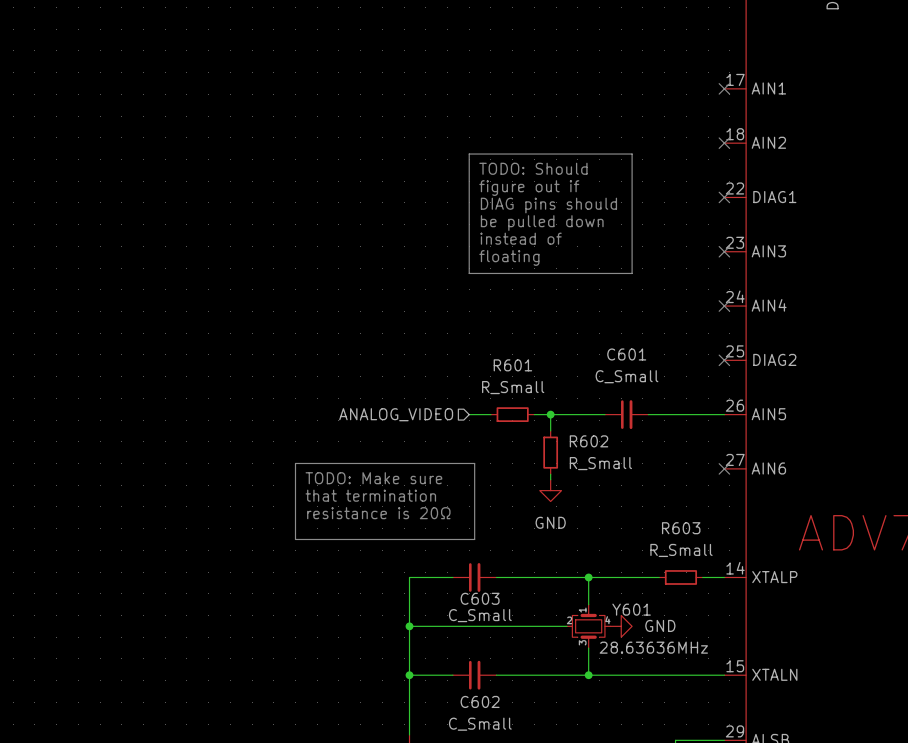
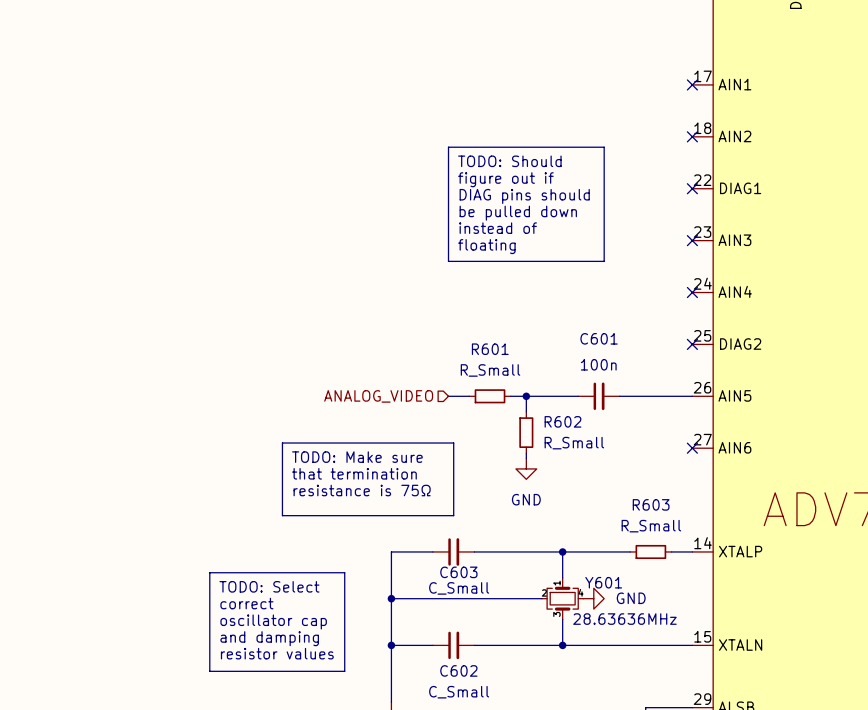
C601 value: C_Small (626, 376) -> 100n (598, 364)
text: resistance is 20Ω (378, 513) -> resistance is 75Ω (362, 490)
line: none -> (209, 572) (344, 572) (344, 671) (209, 671) (209, 572)
text: none -> TODO: Select (269, 586)
text: none -> correct (246, 603)
text: none -> oscillator cap (273, 621)
text: none -> and damping (269, 638)
text: none -> resistor values (277, 653)

